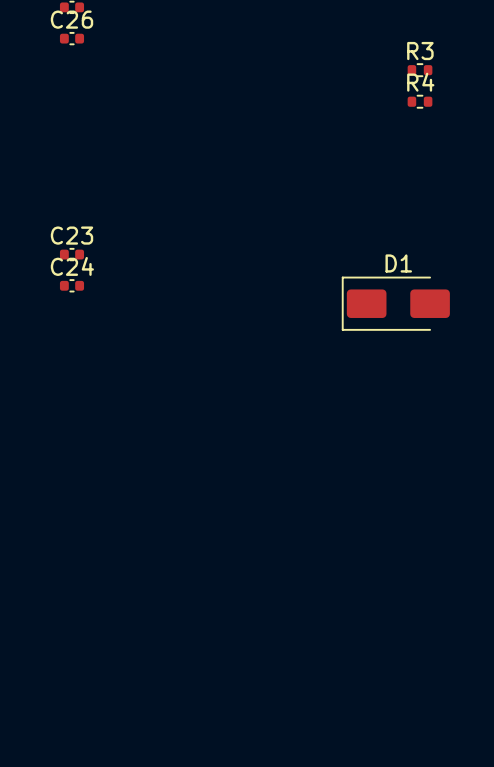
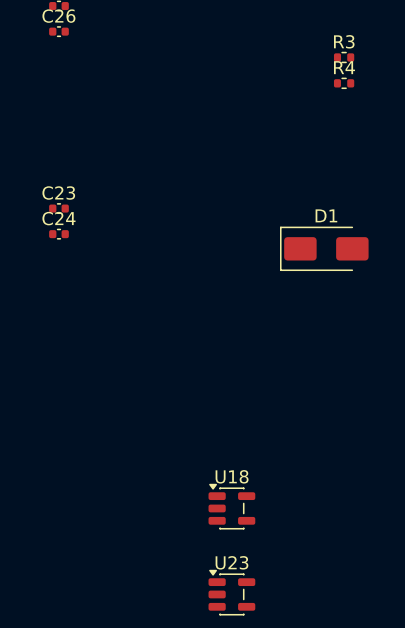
U18: none -> (231, 506)
U23: none -> (231, 592)

